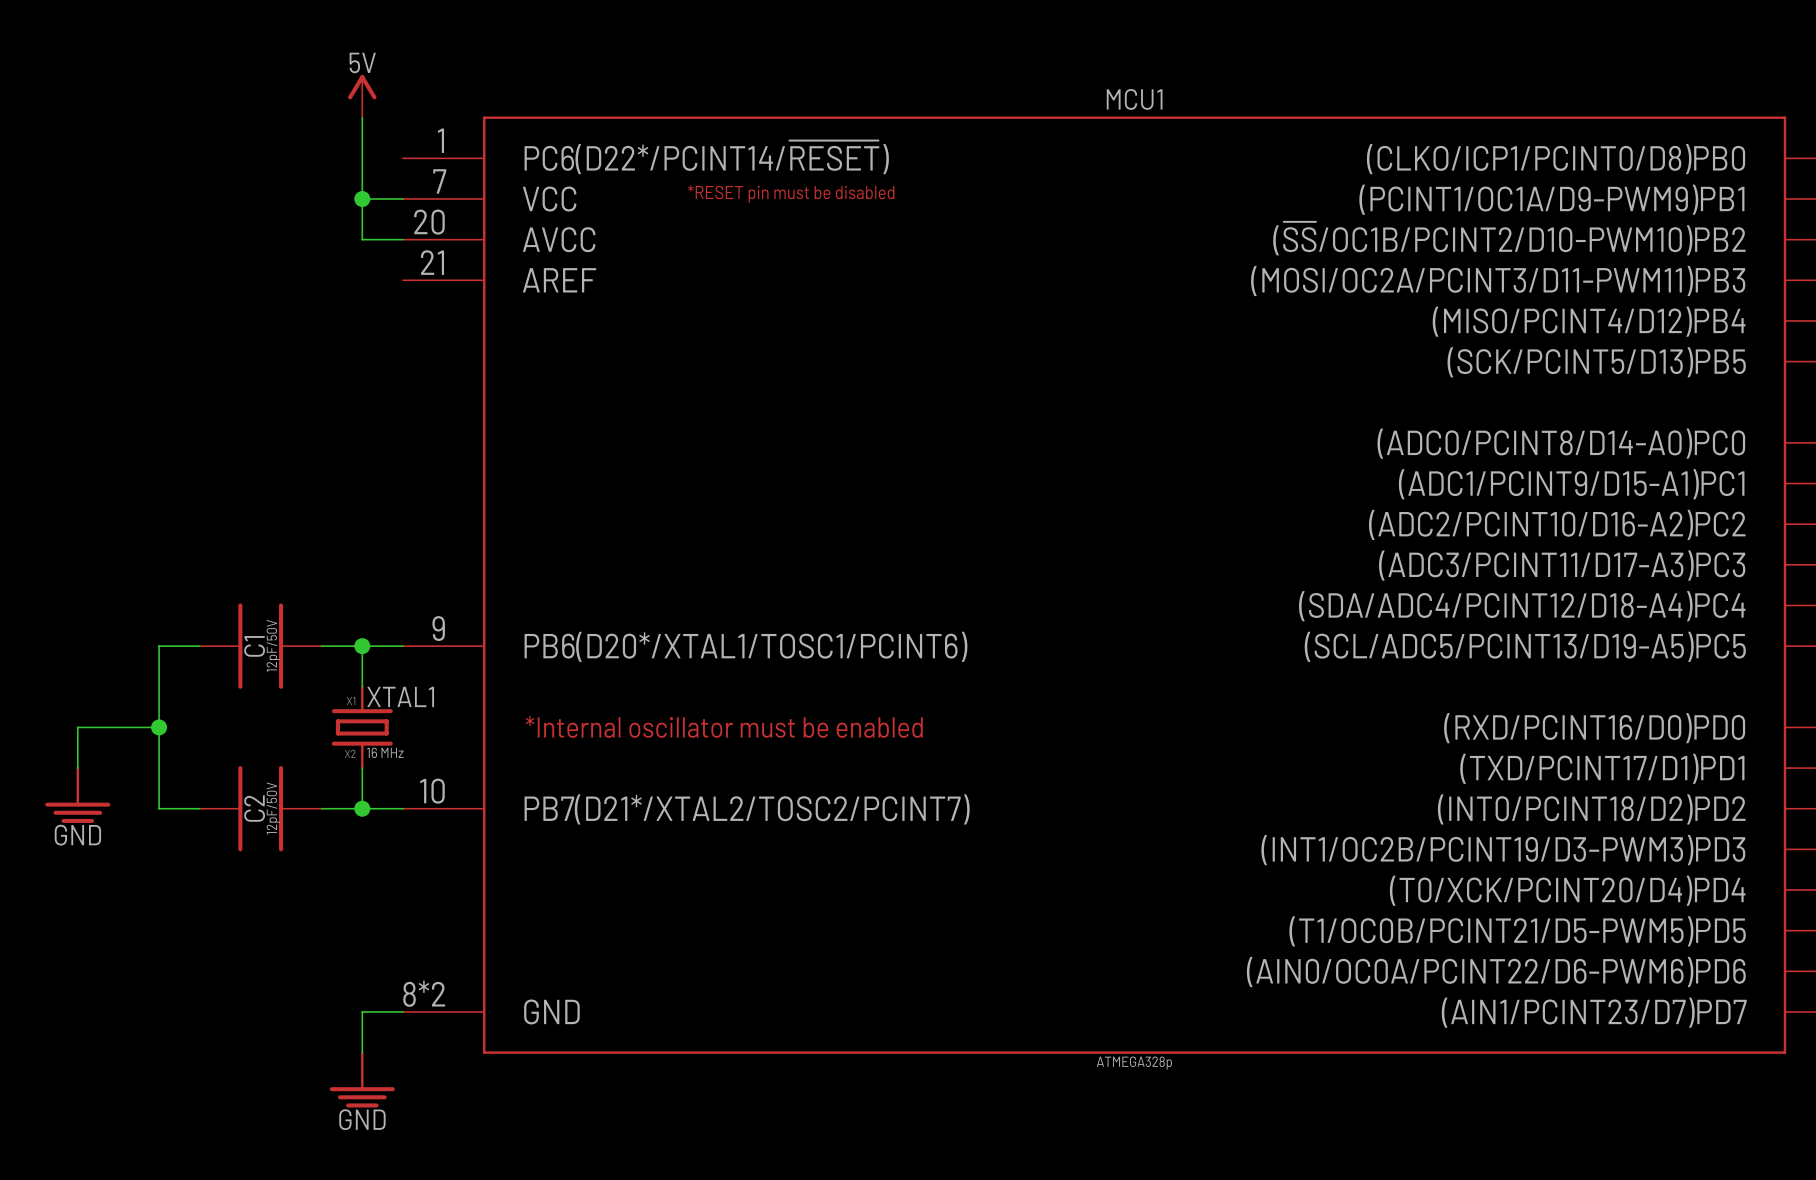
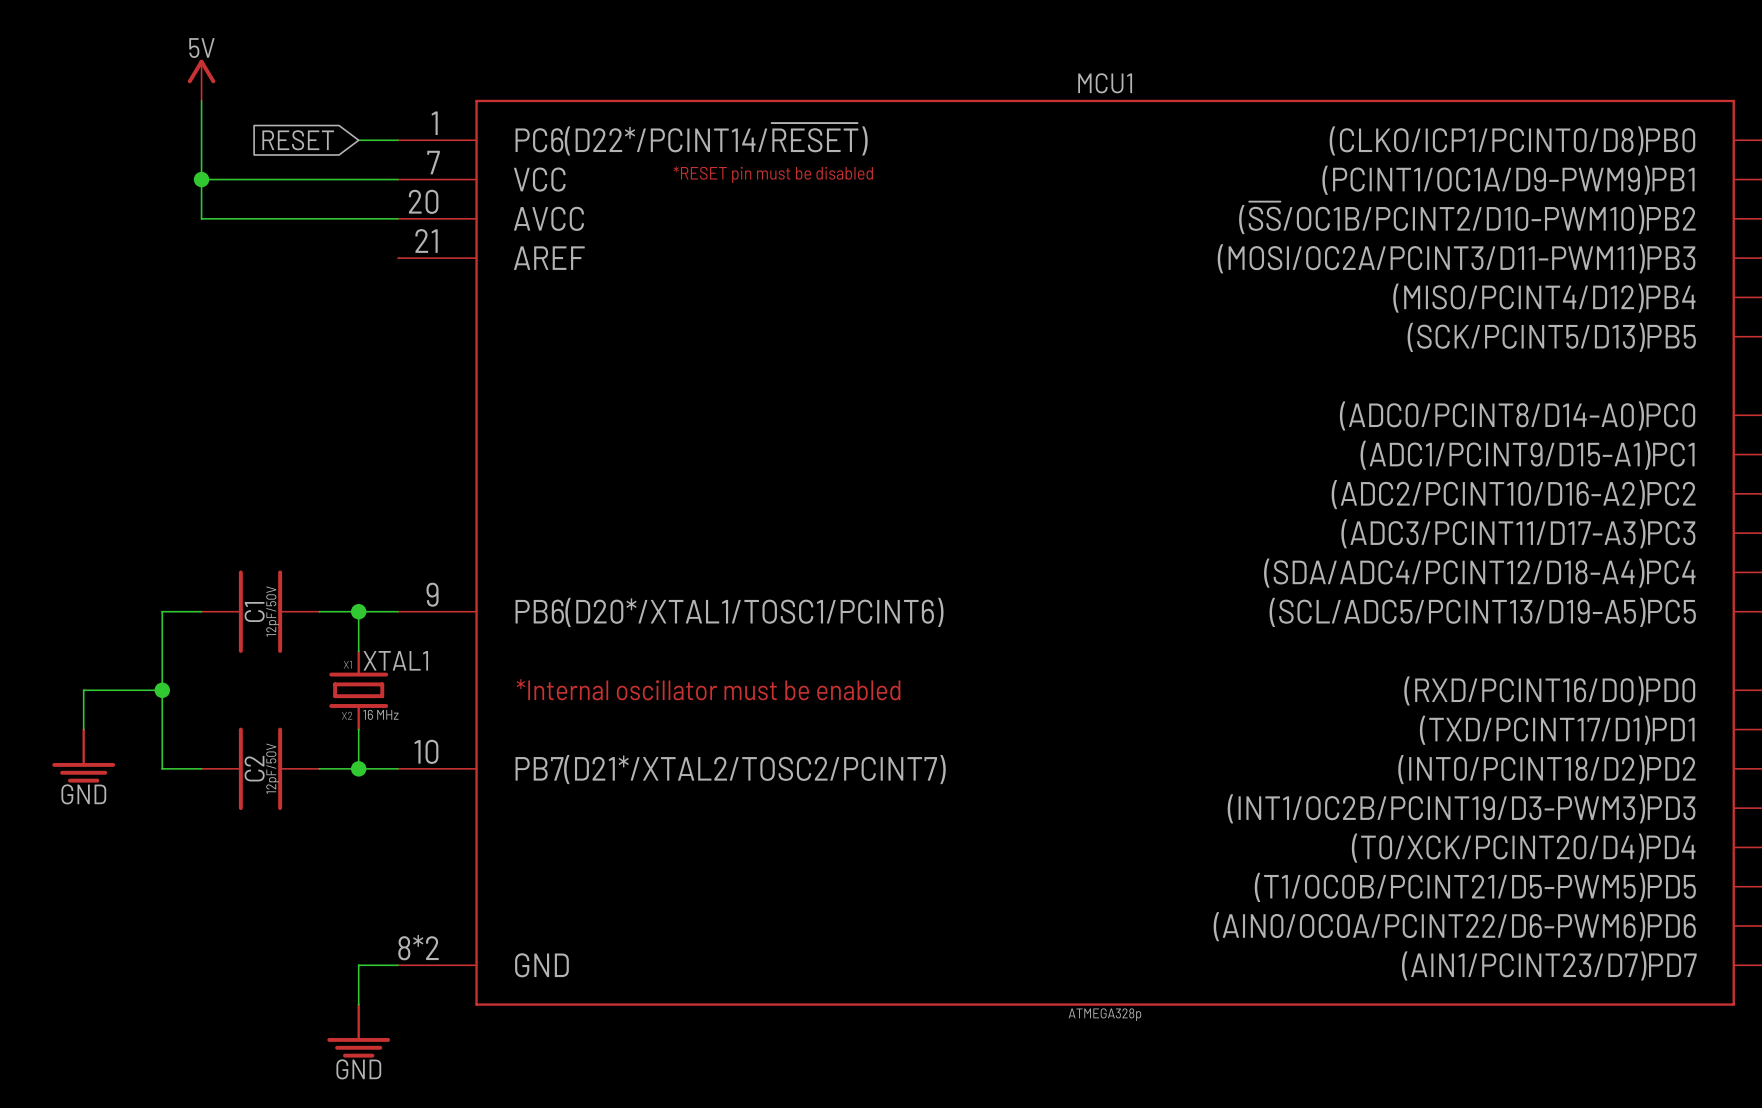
power symbol position: (362, 96) -> (201, 80)
wire: (362, 117) (362, 239) -> (201, 100) (201, 218) (358, 218)
global label: none -> RESET (298, 140)
wire: none -> (358, 140) (397, 140)
wire: none -> (201, 179) (358, 179)
junction: none -> (201, 179)
junction: (362, 199) -> none

